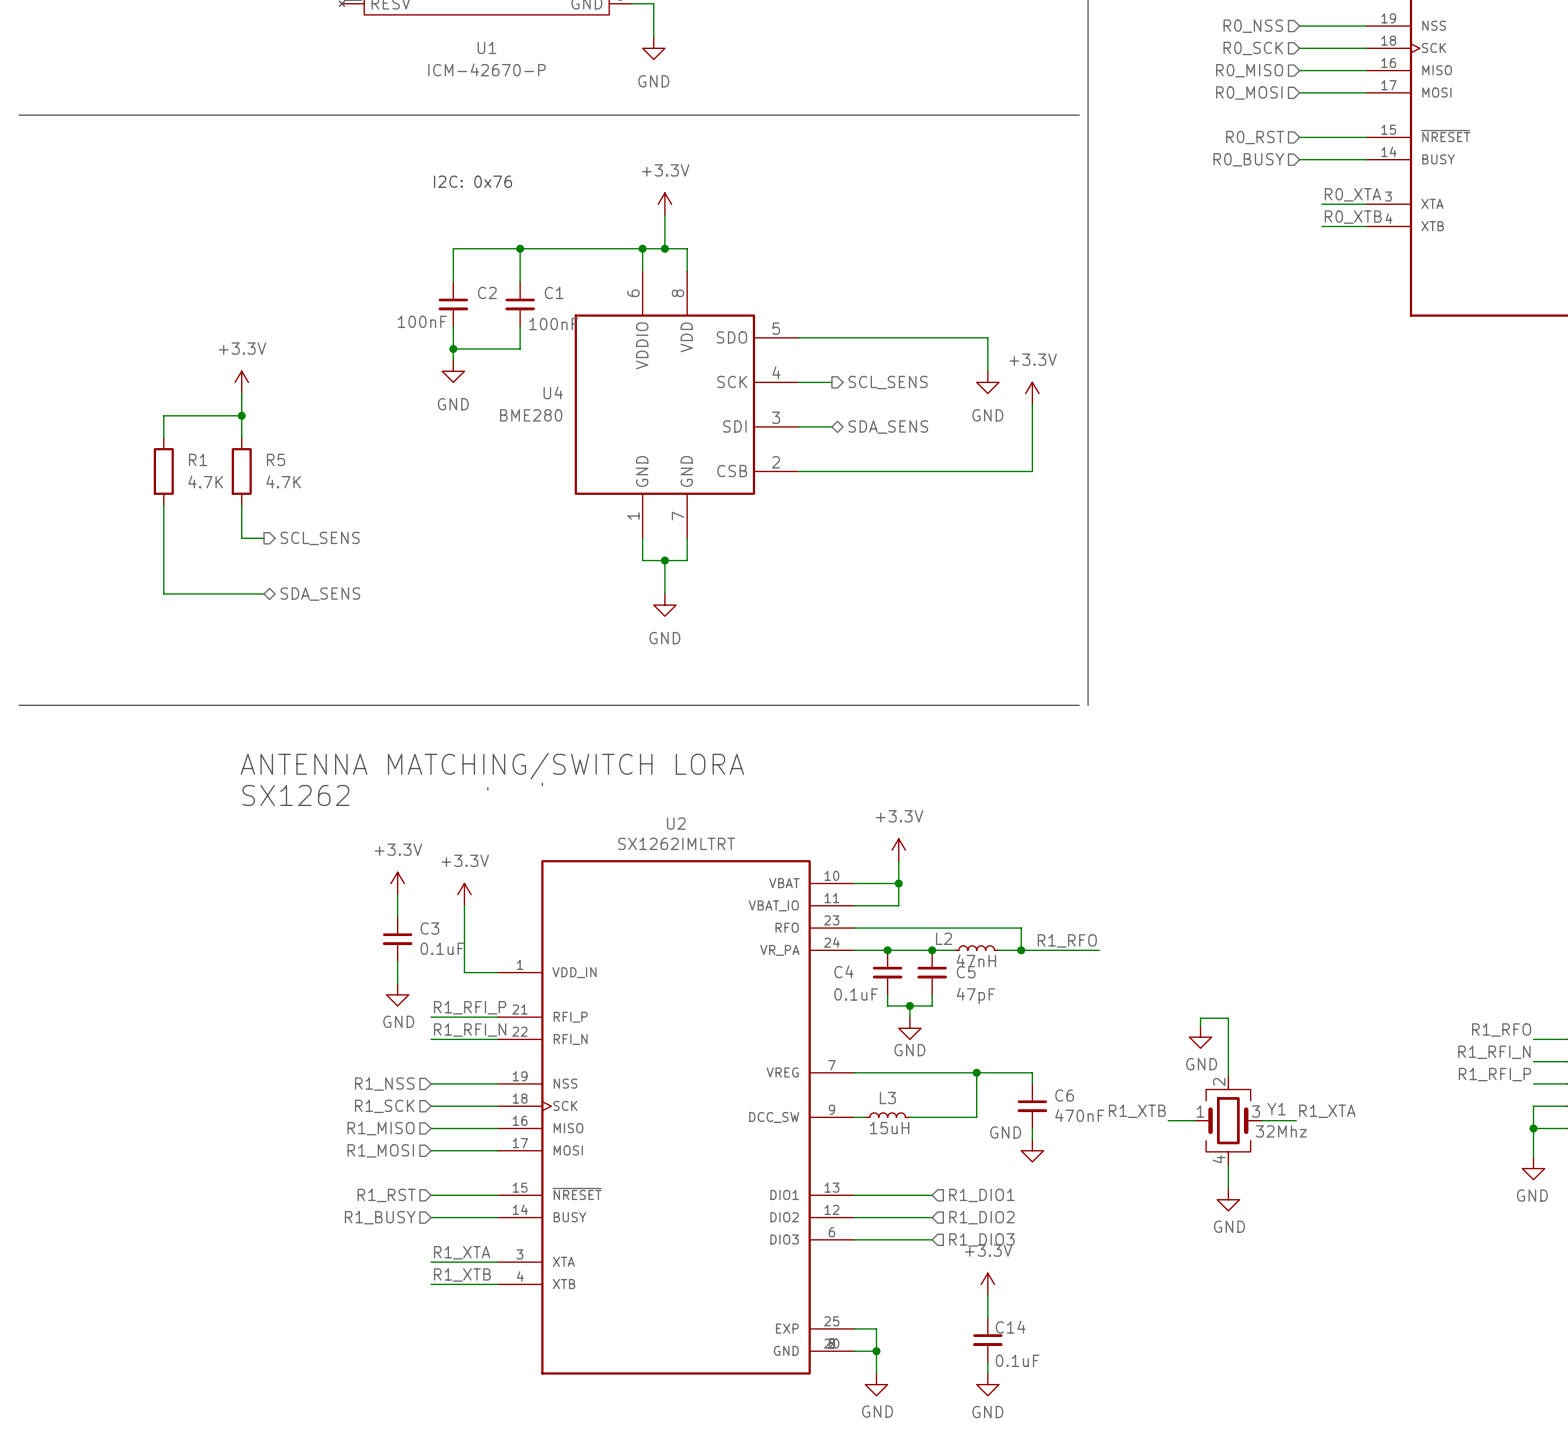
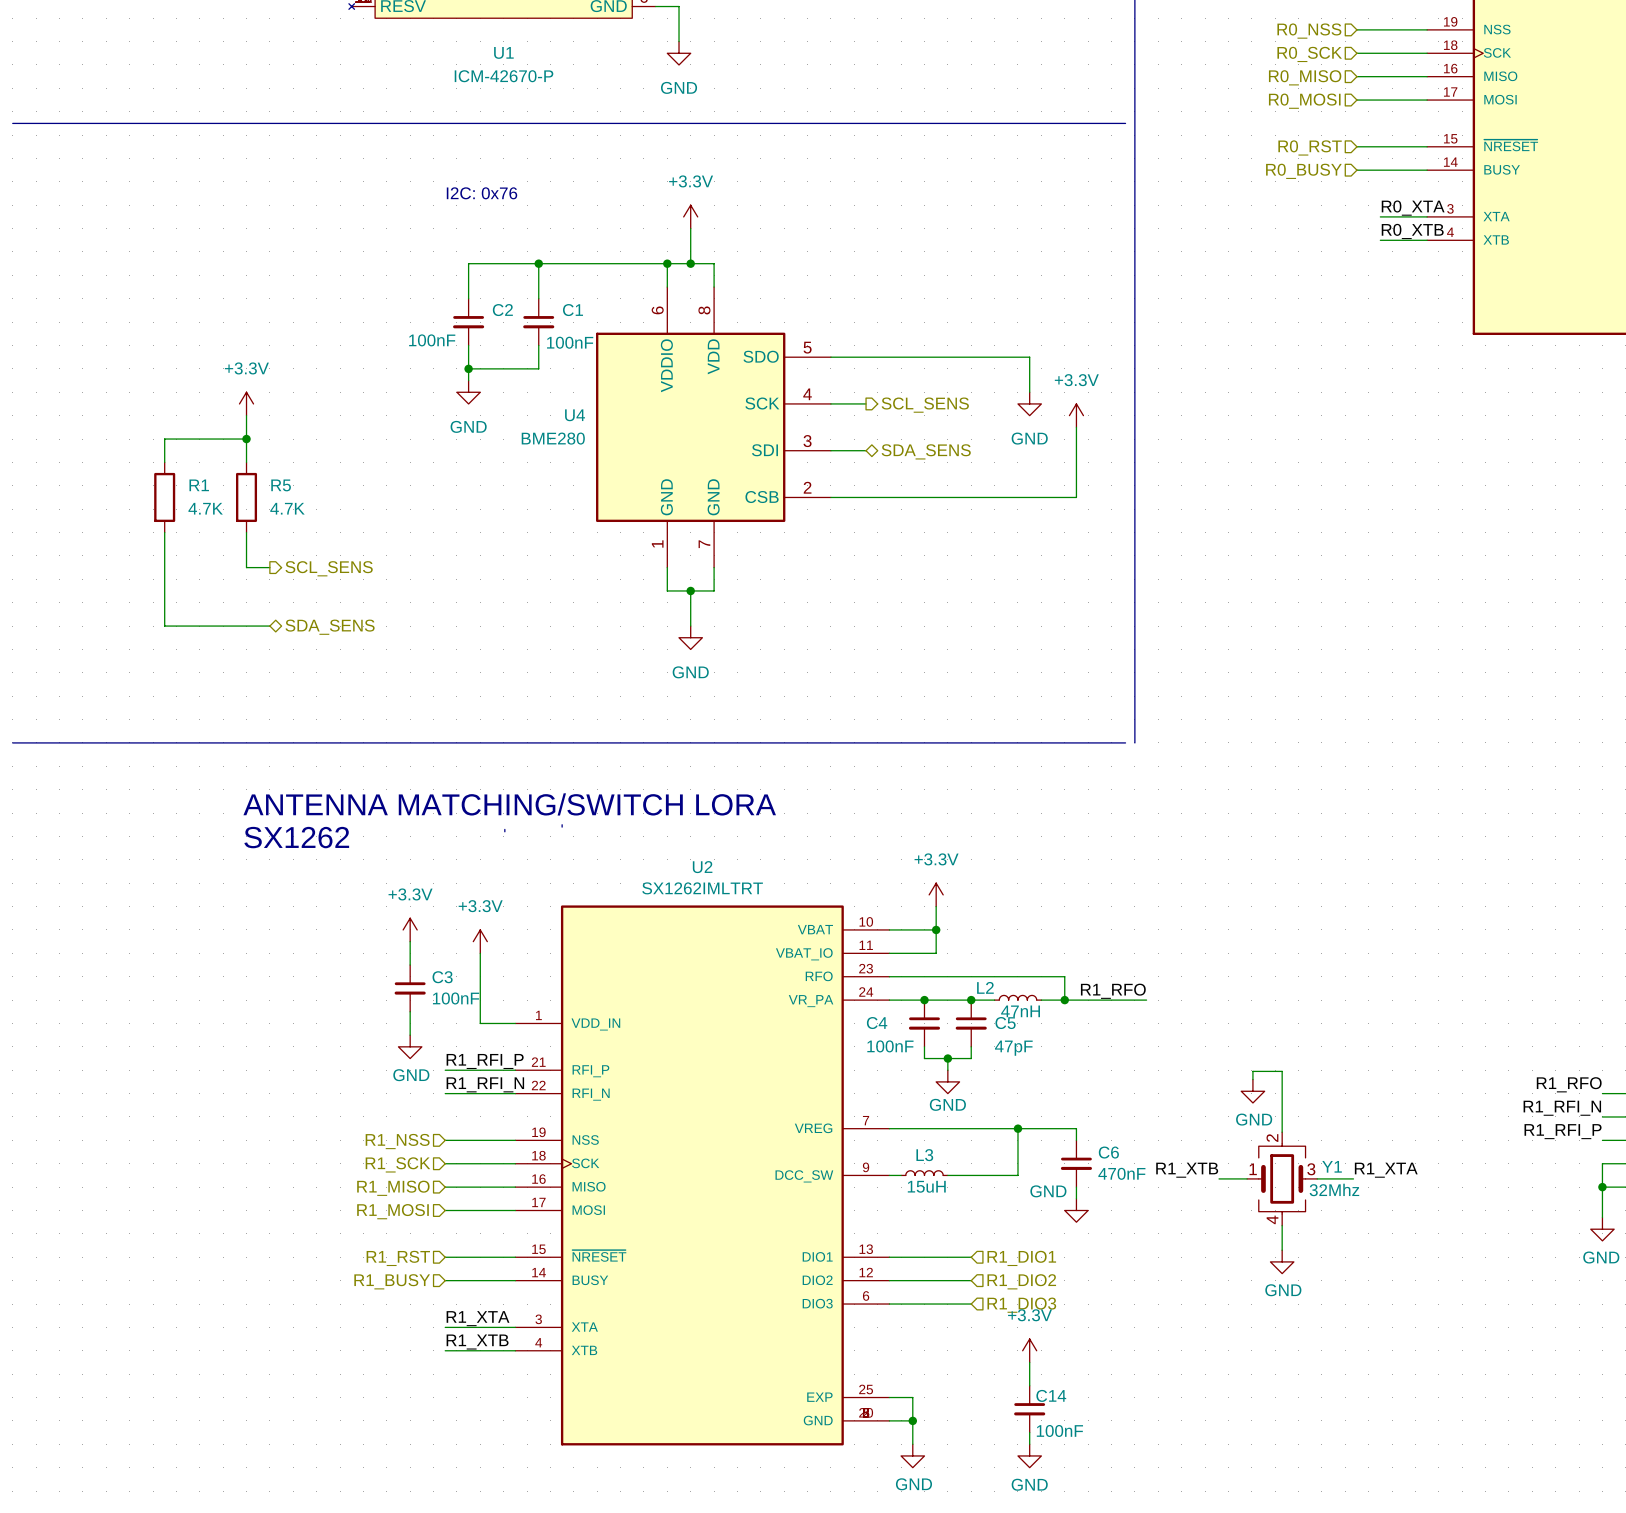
C3 value: 0.1uF (442, 948) -> 100nF (456, 998)
C4 value: 0.1uF (856, 994) -> 100nF (890, 1046)
C14 value: 0.1uF (1017, 1360) -> 100nF (1059, 1430)

